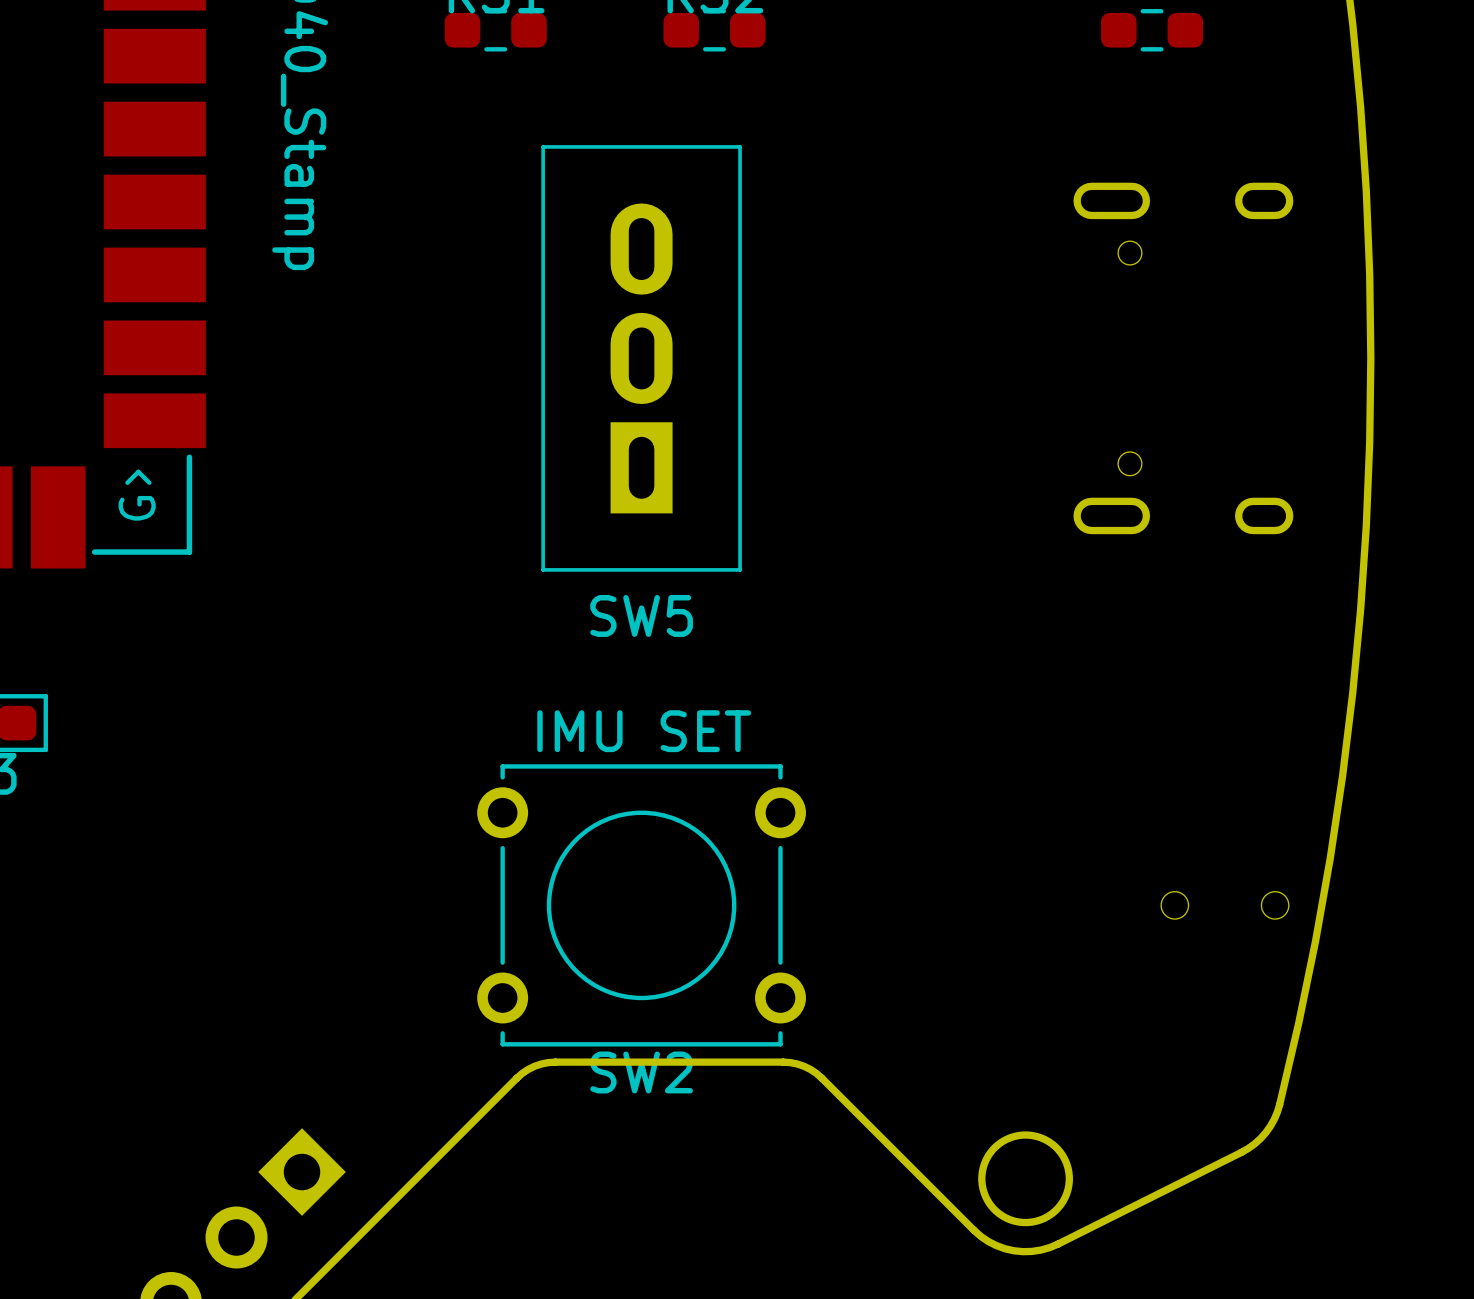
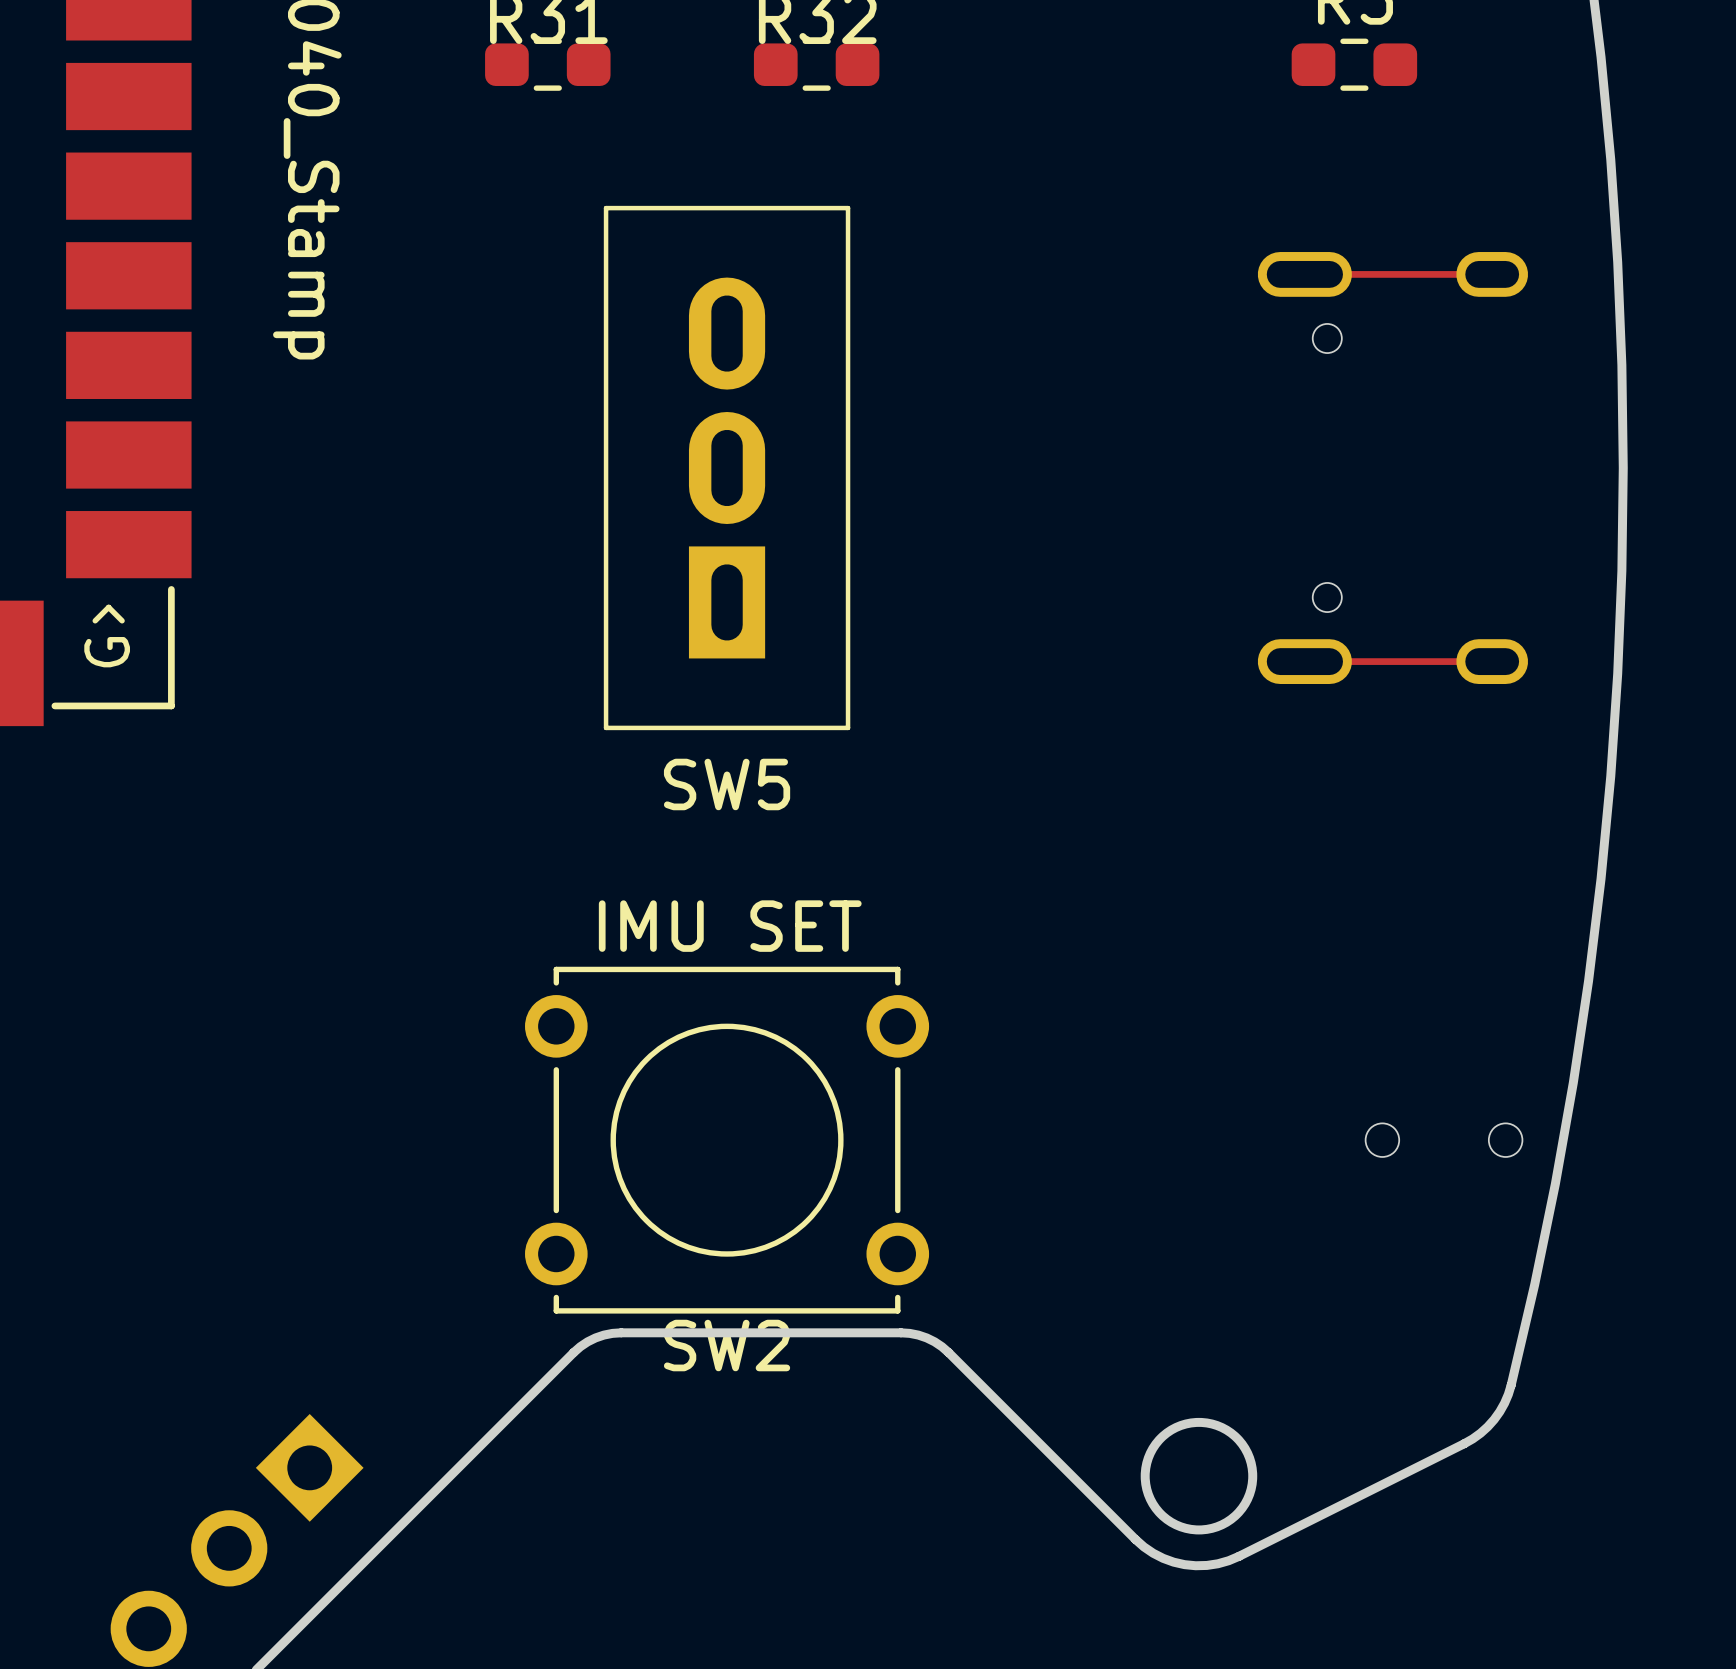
track: none -> (1304, 274) (1492, 274)
track: none -> (1304, 661) (1492, 661)

